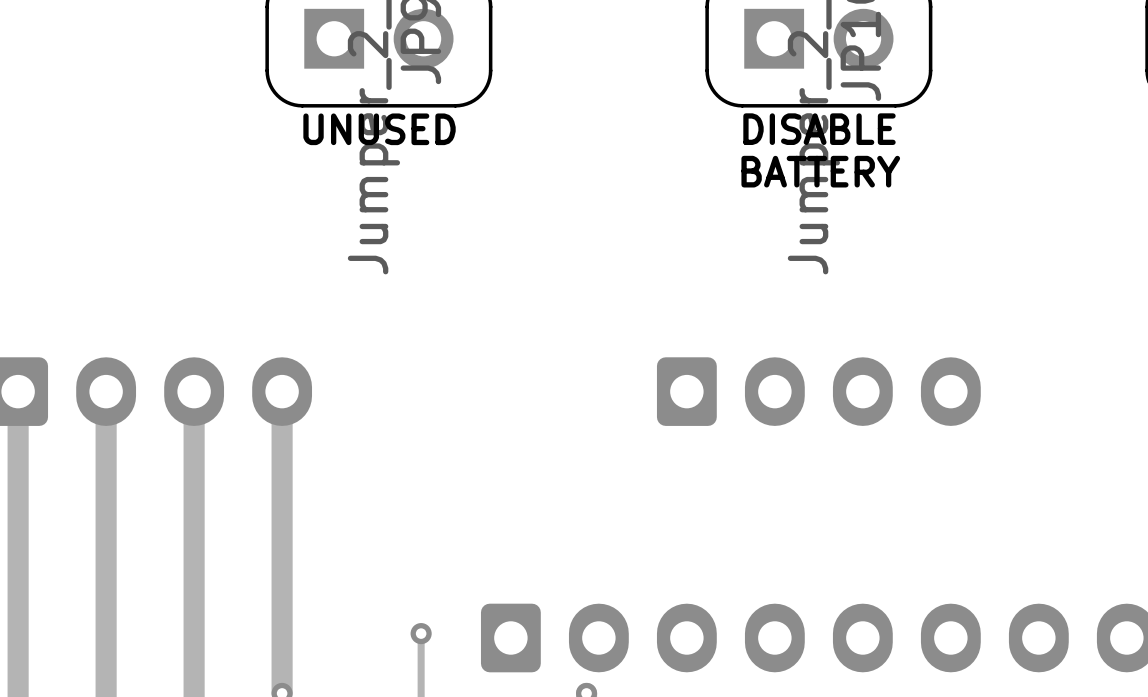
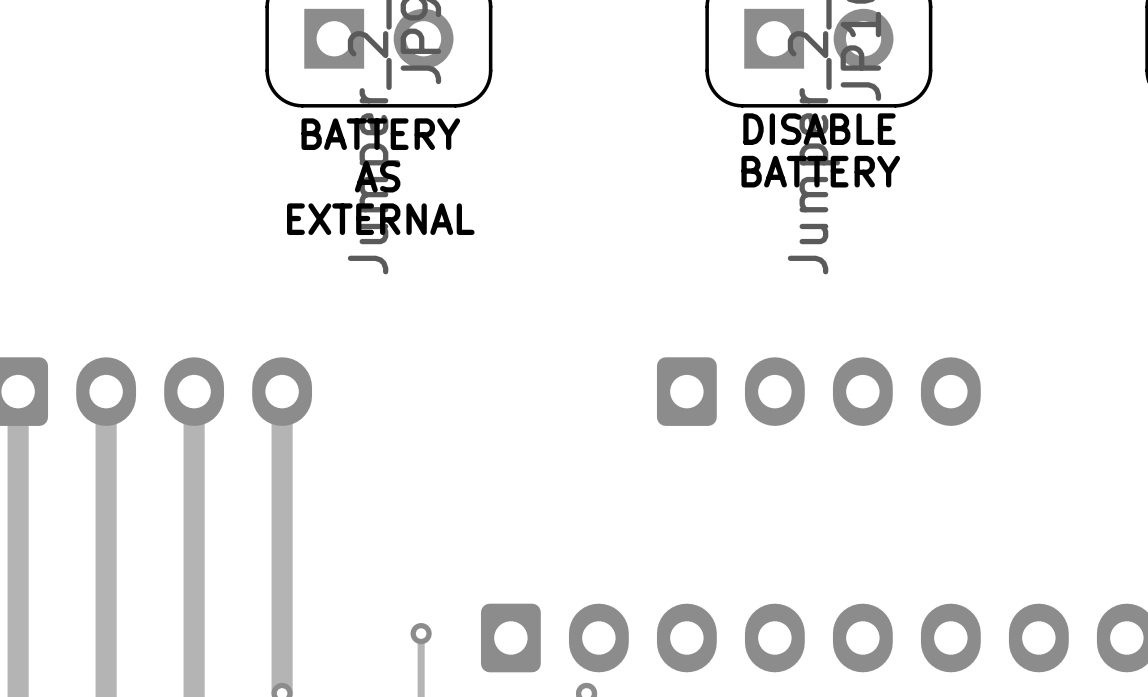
text: UNUSED (379, 129) -> BATTERY (380, 134)
text: none -> AS (377, 176)
text: none -> EXTERNAL (380, 219)

